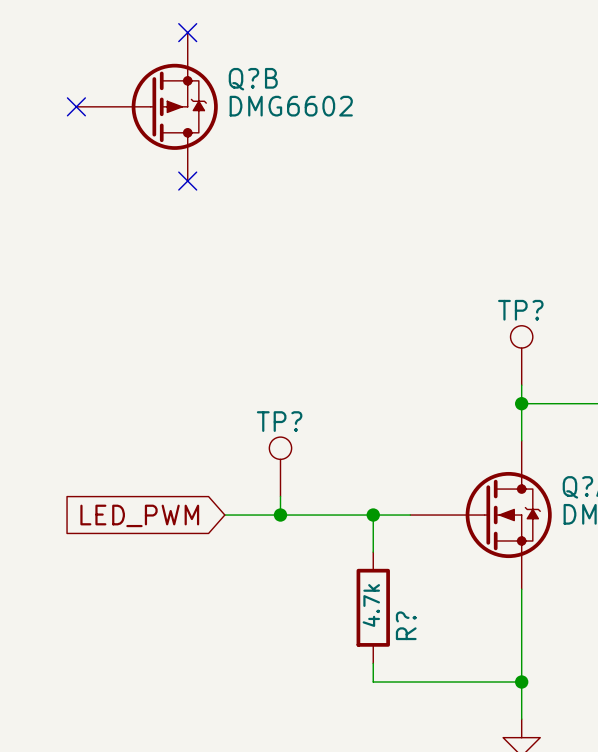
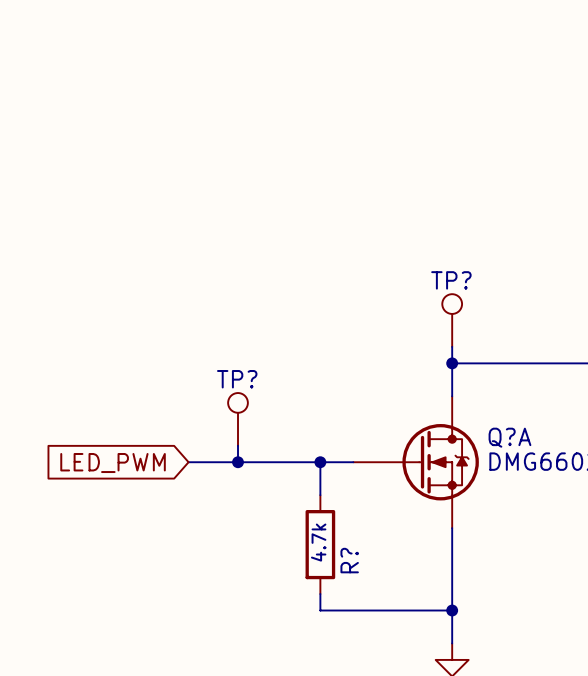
no-connect mark: (187, 32) -> none
no-connect mark: (76, 106) -> none
Q?B: DMG6602 (147, 106) -> none
no-connect mark: (187, 181) -> none

